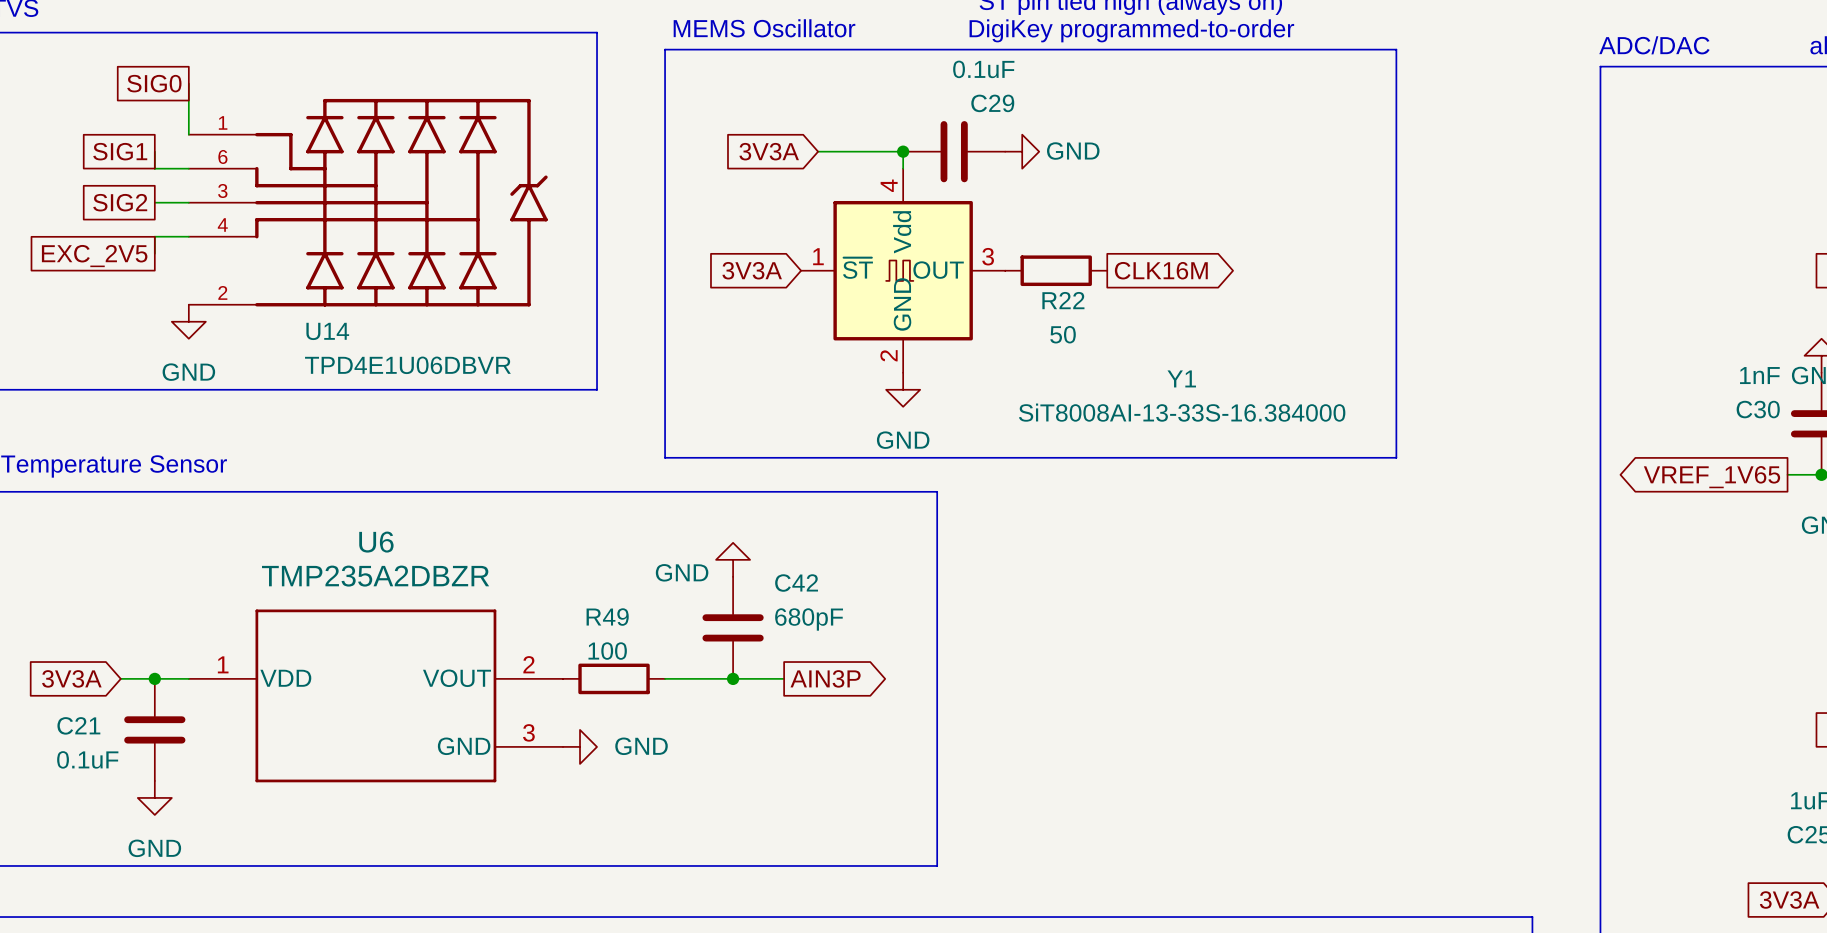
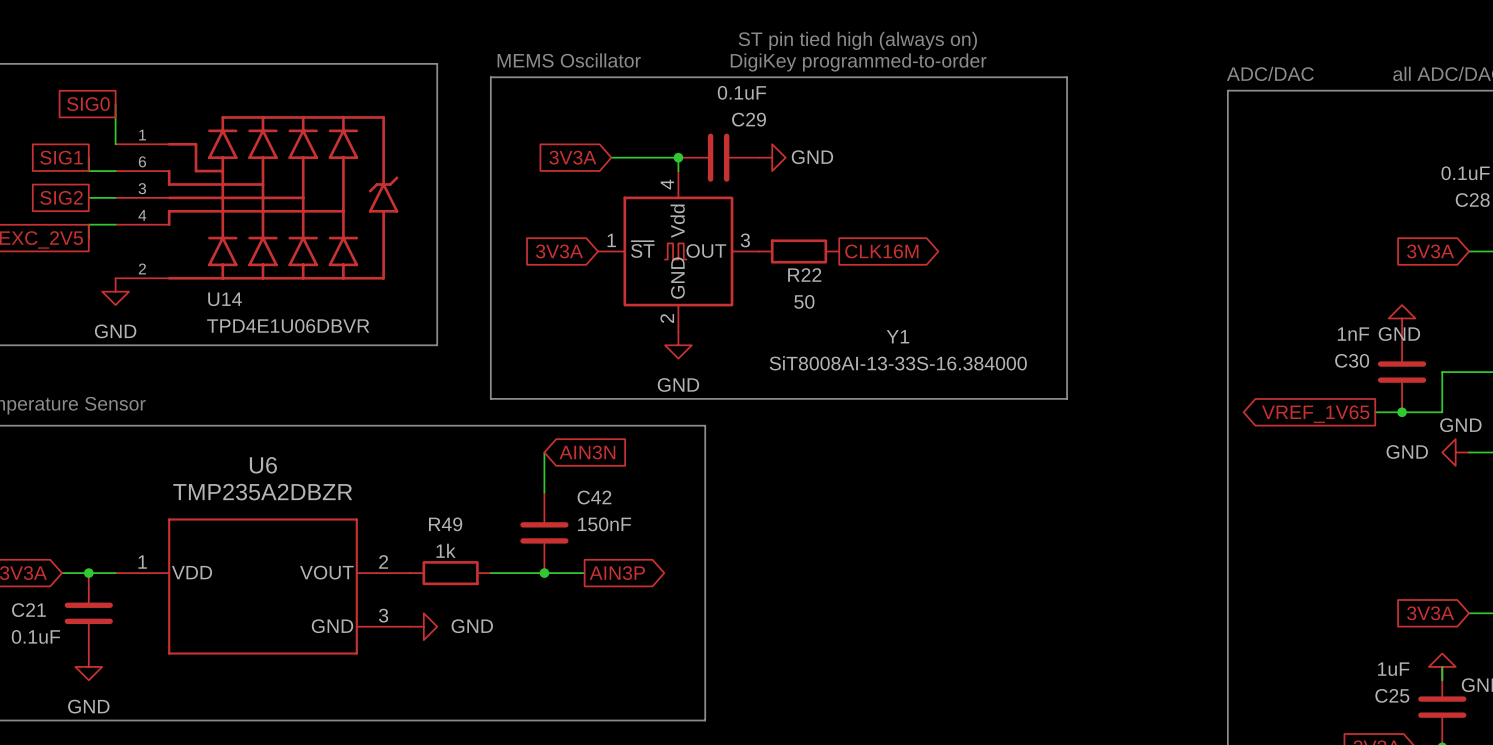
wire: none -> (544, 452) (544, 492)
global label: none -> AIN3N (587, 452)
power symbol: GND (733, 559) -> none
C42 value: 680pF (809, 619) -> 150nF (604, 524)
R49 value: 100 (607, 651) -> 1k (446, 550)

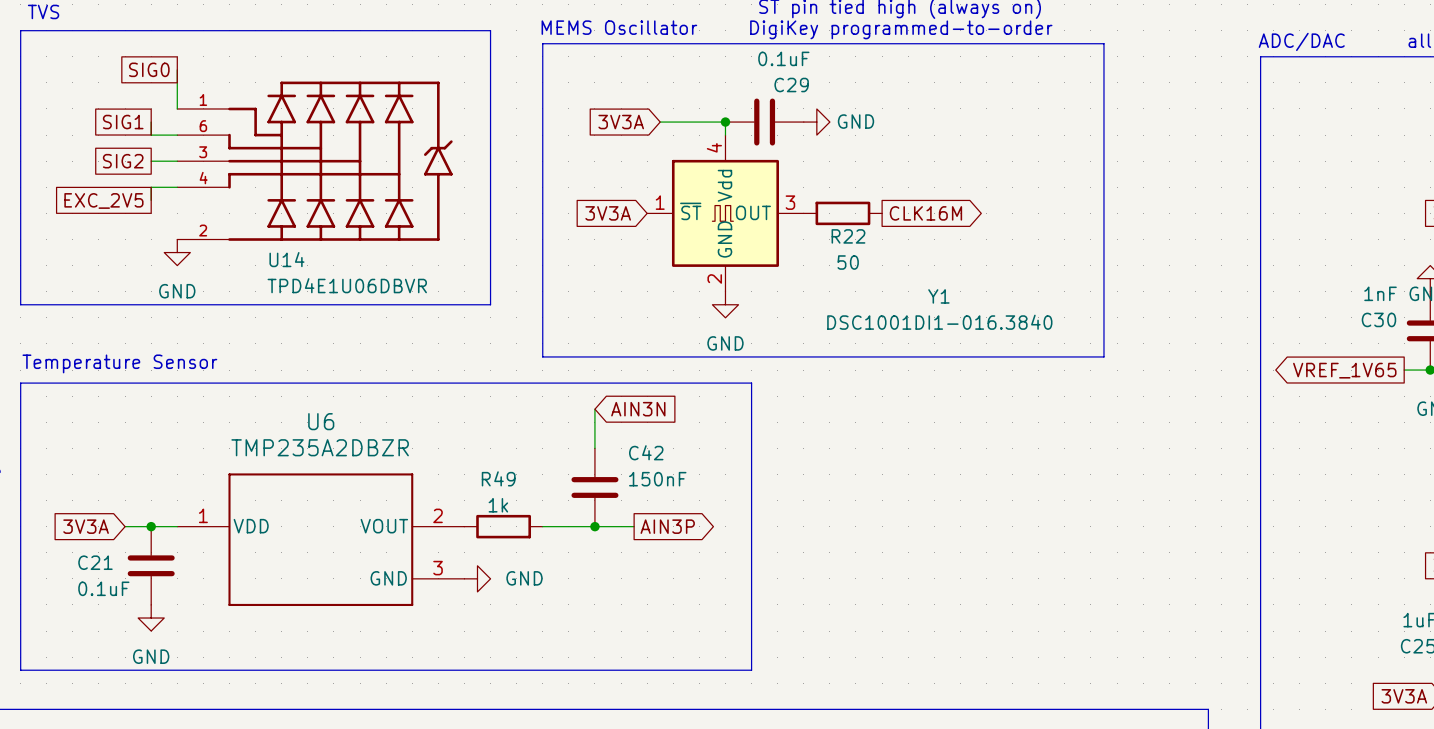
Y1 value: SiT8008AI-13-33S-16.384000 (898, 363) -> DSC1001DI1-016.3840 (939, 322)

